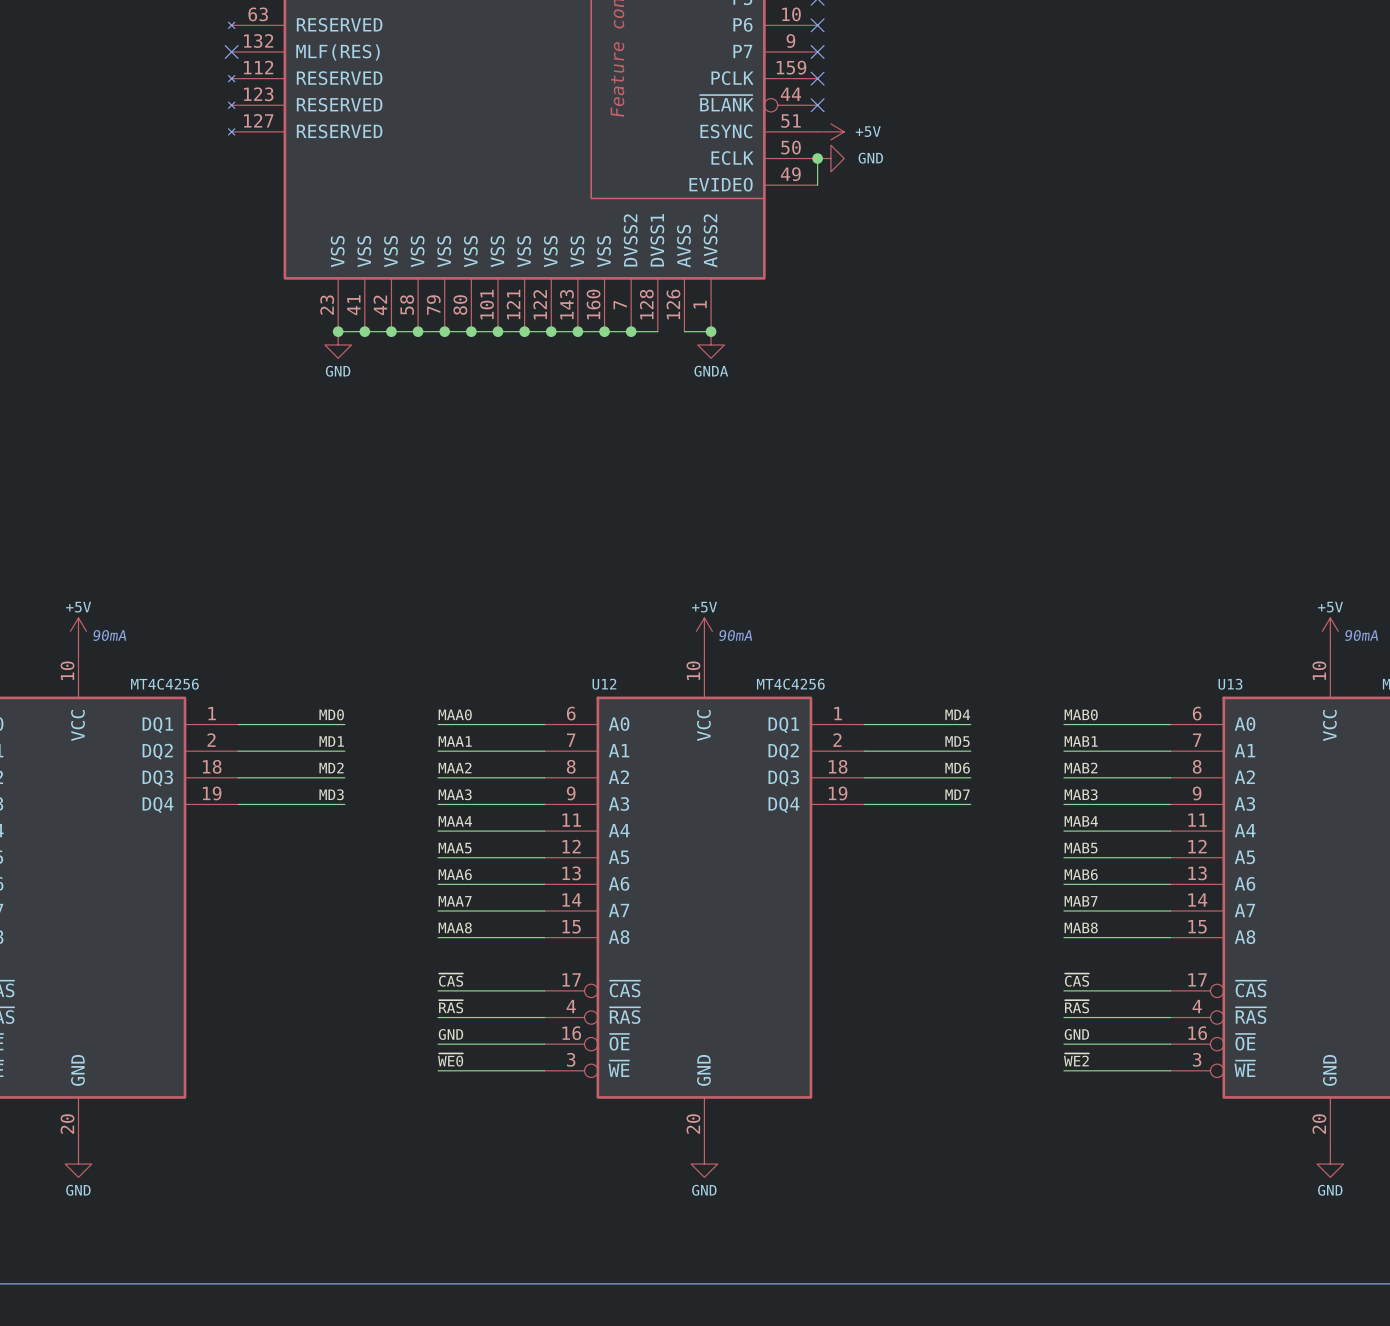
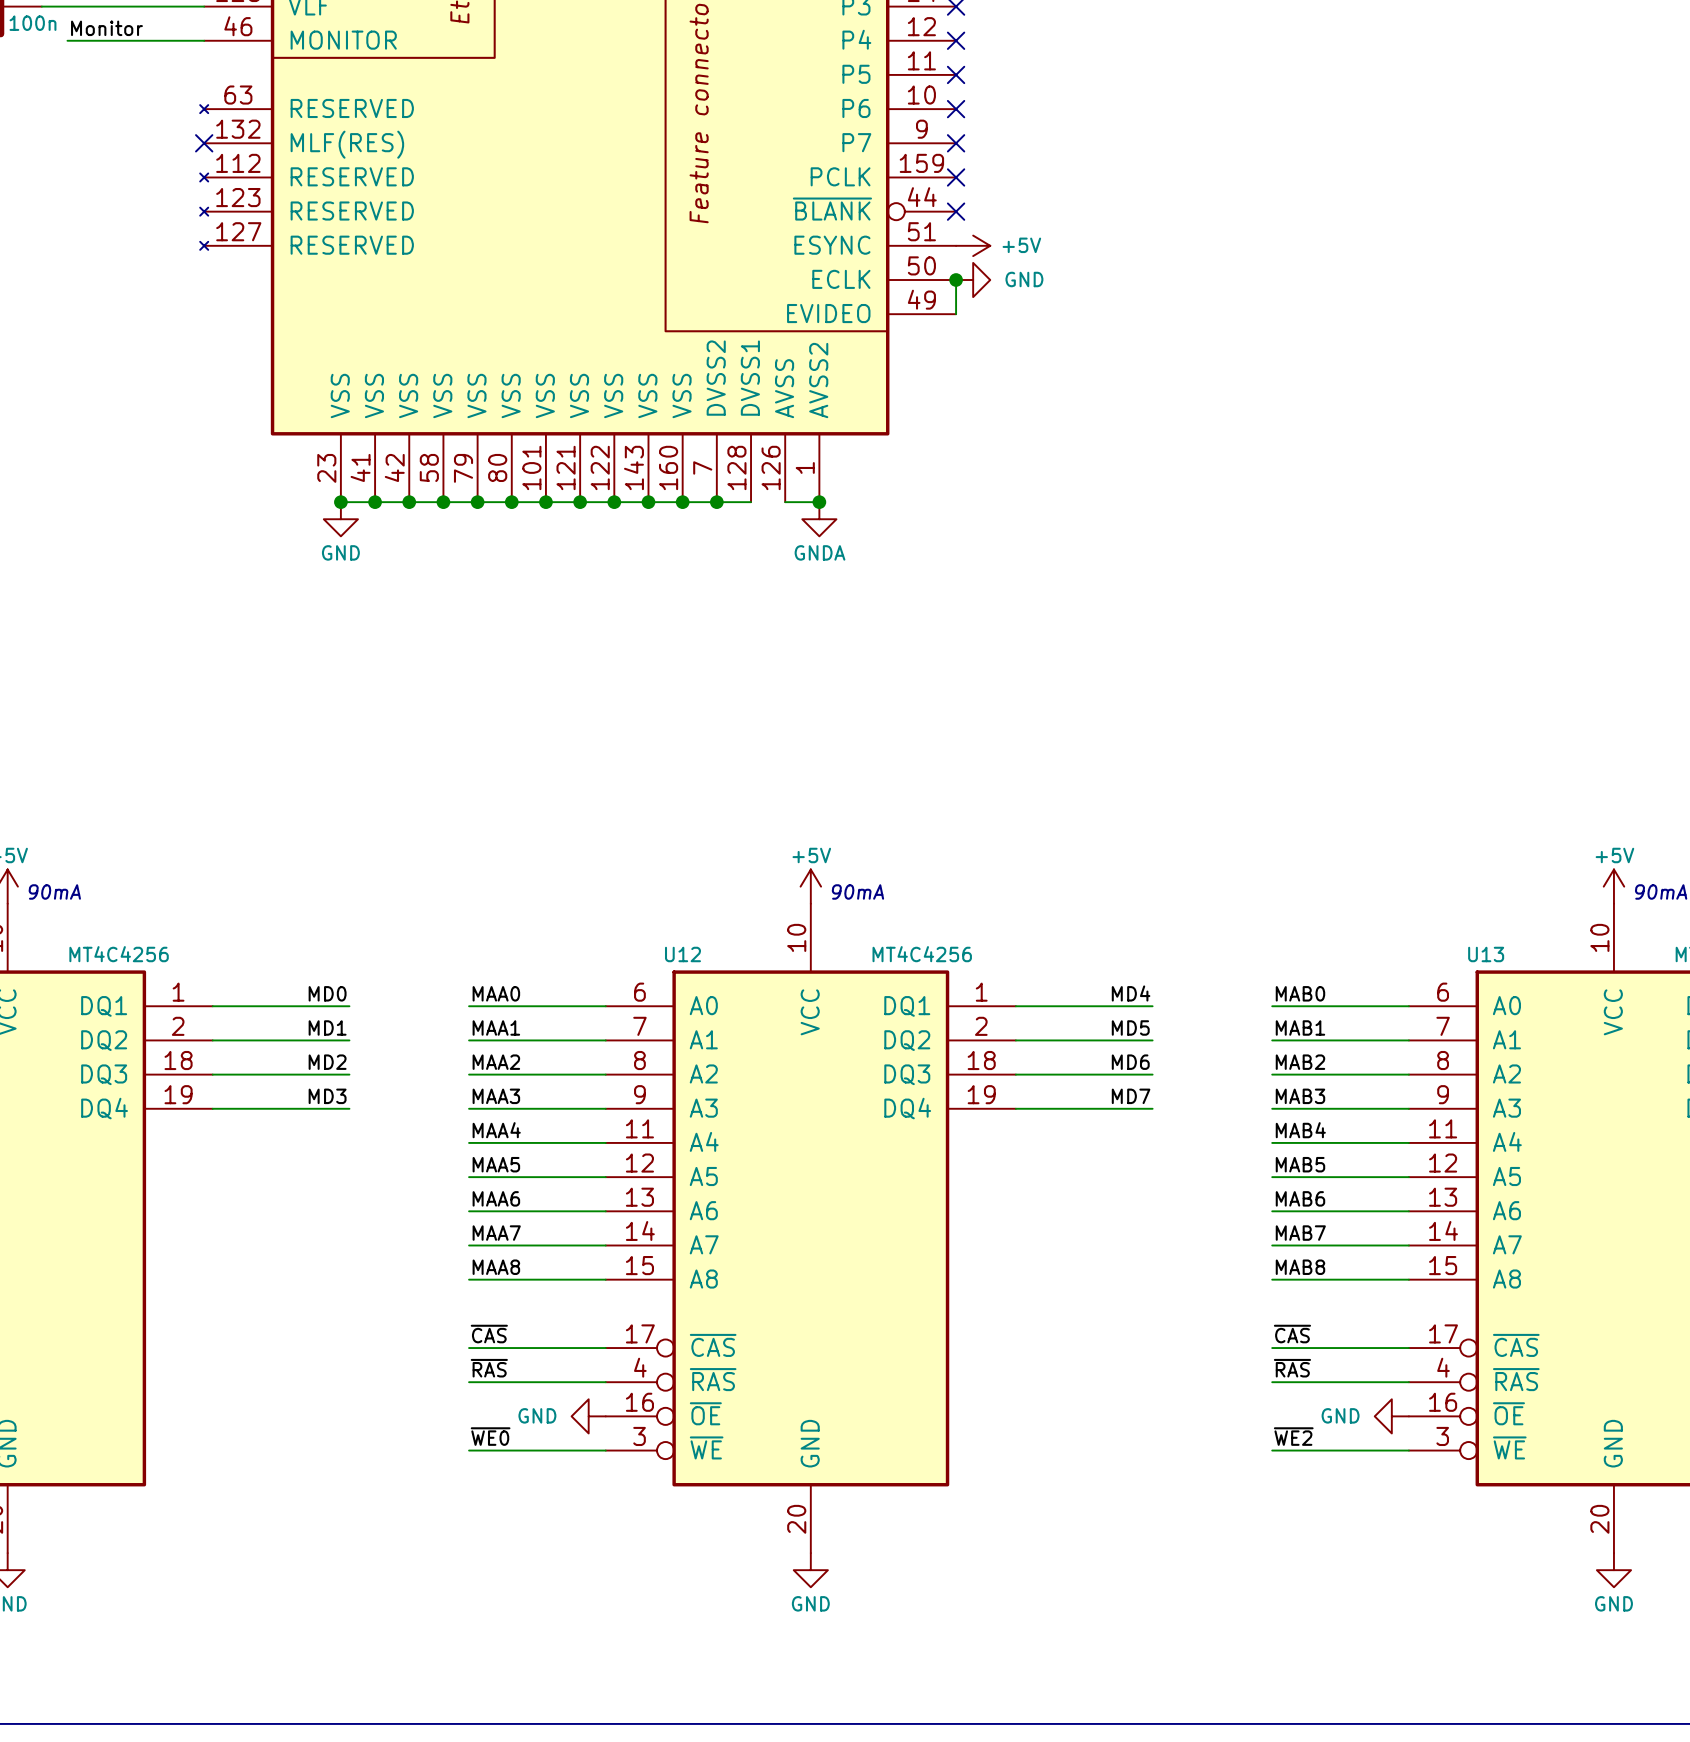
label: GND (450, 1034) -> none
label: GND (1076, 1034) -> none
wire: (438, 1044) (544, 1044) -> none
power symbol: none -> GND (588, 1416)
wire: (1064, 1044) (1170, 1044) -> none
power symbol: none -> GND (1391, 1416)

